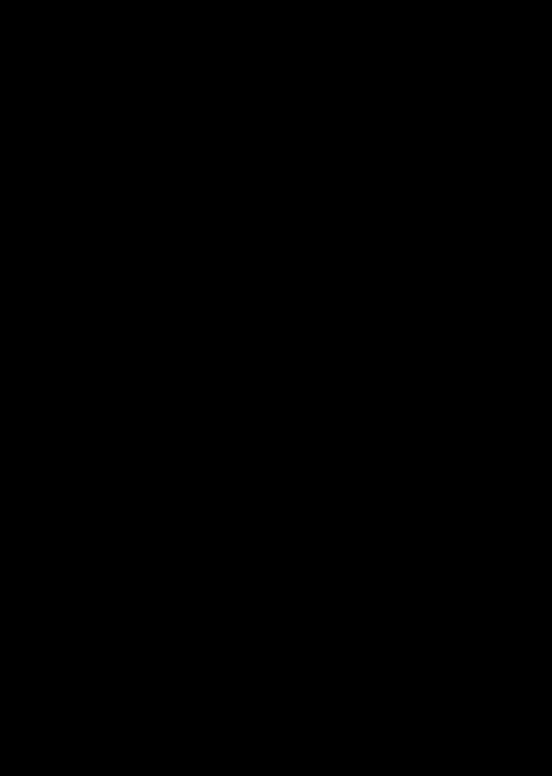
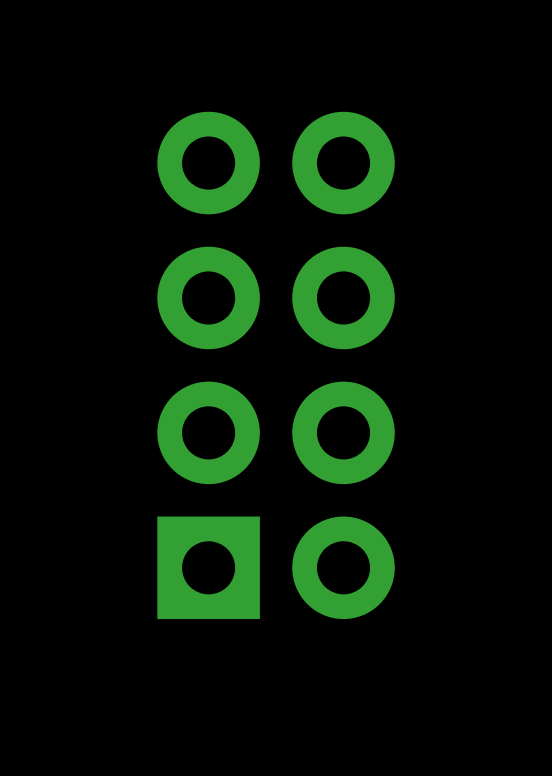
part: none -> (276, 365)

